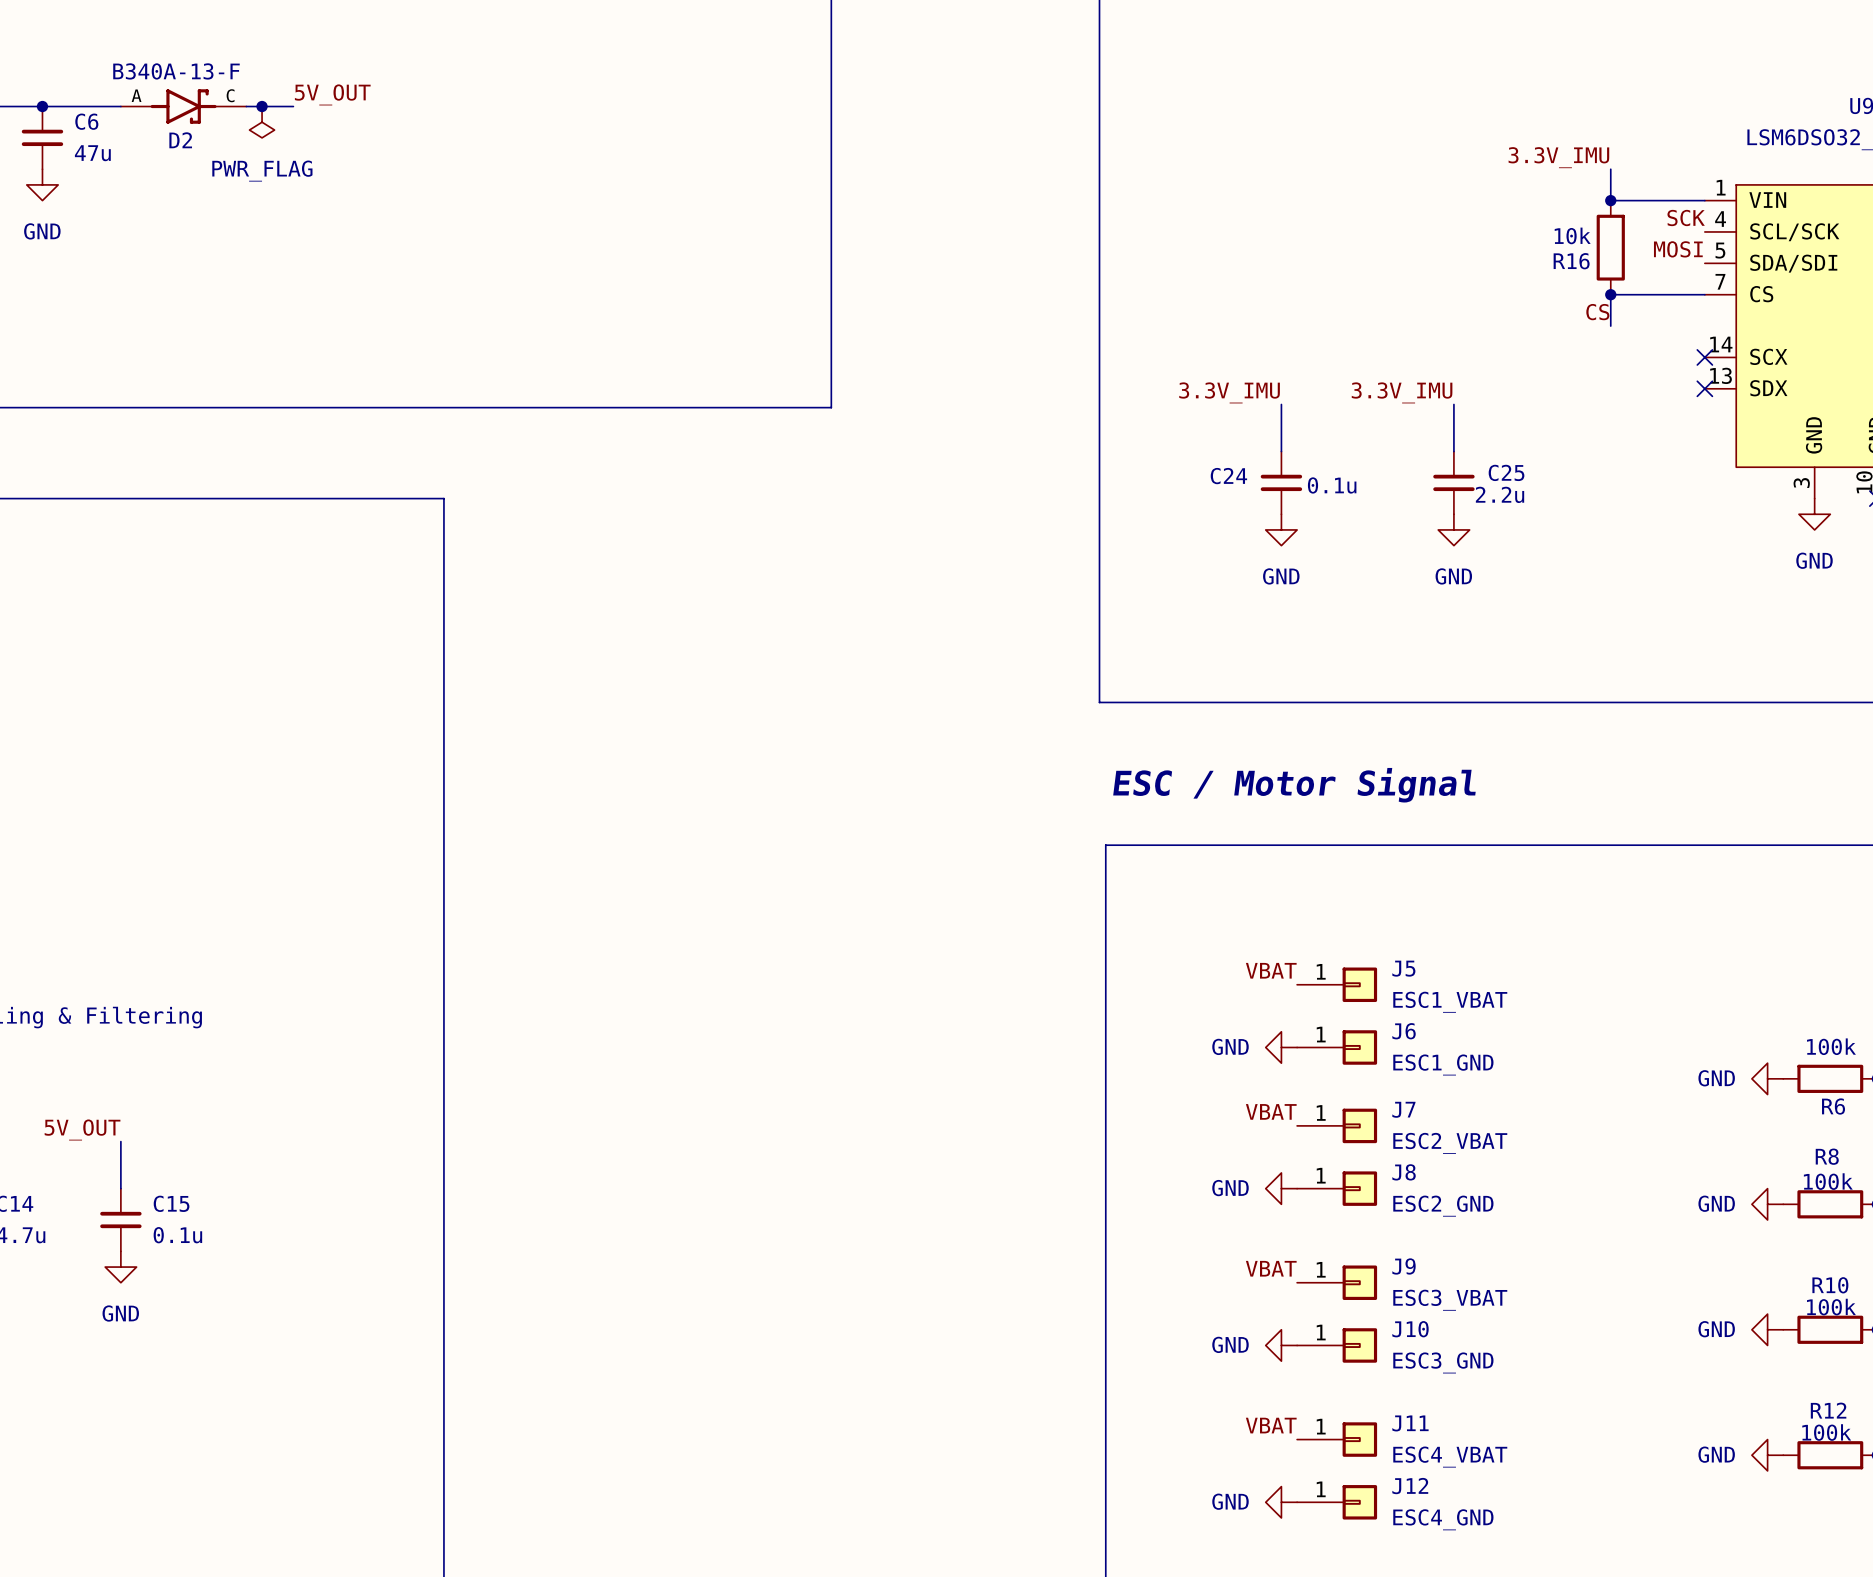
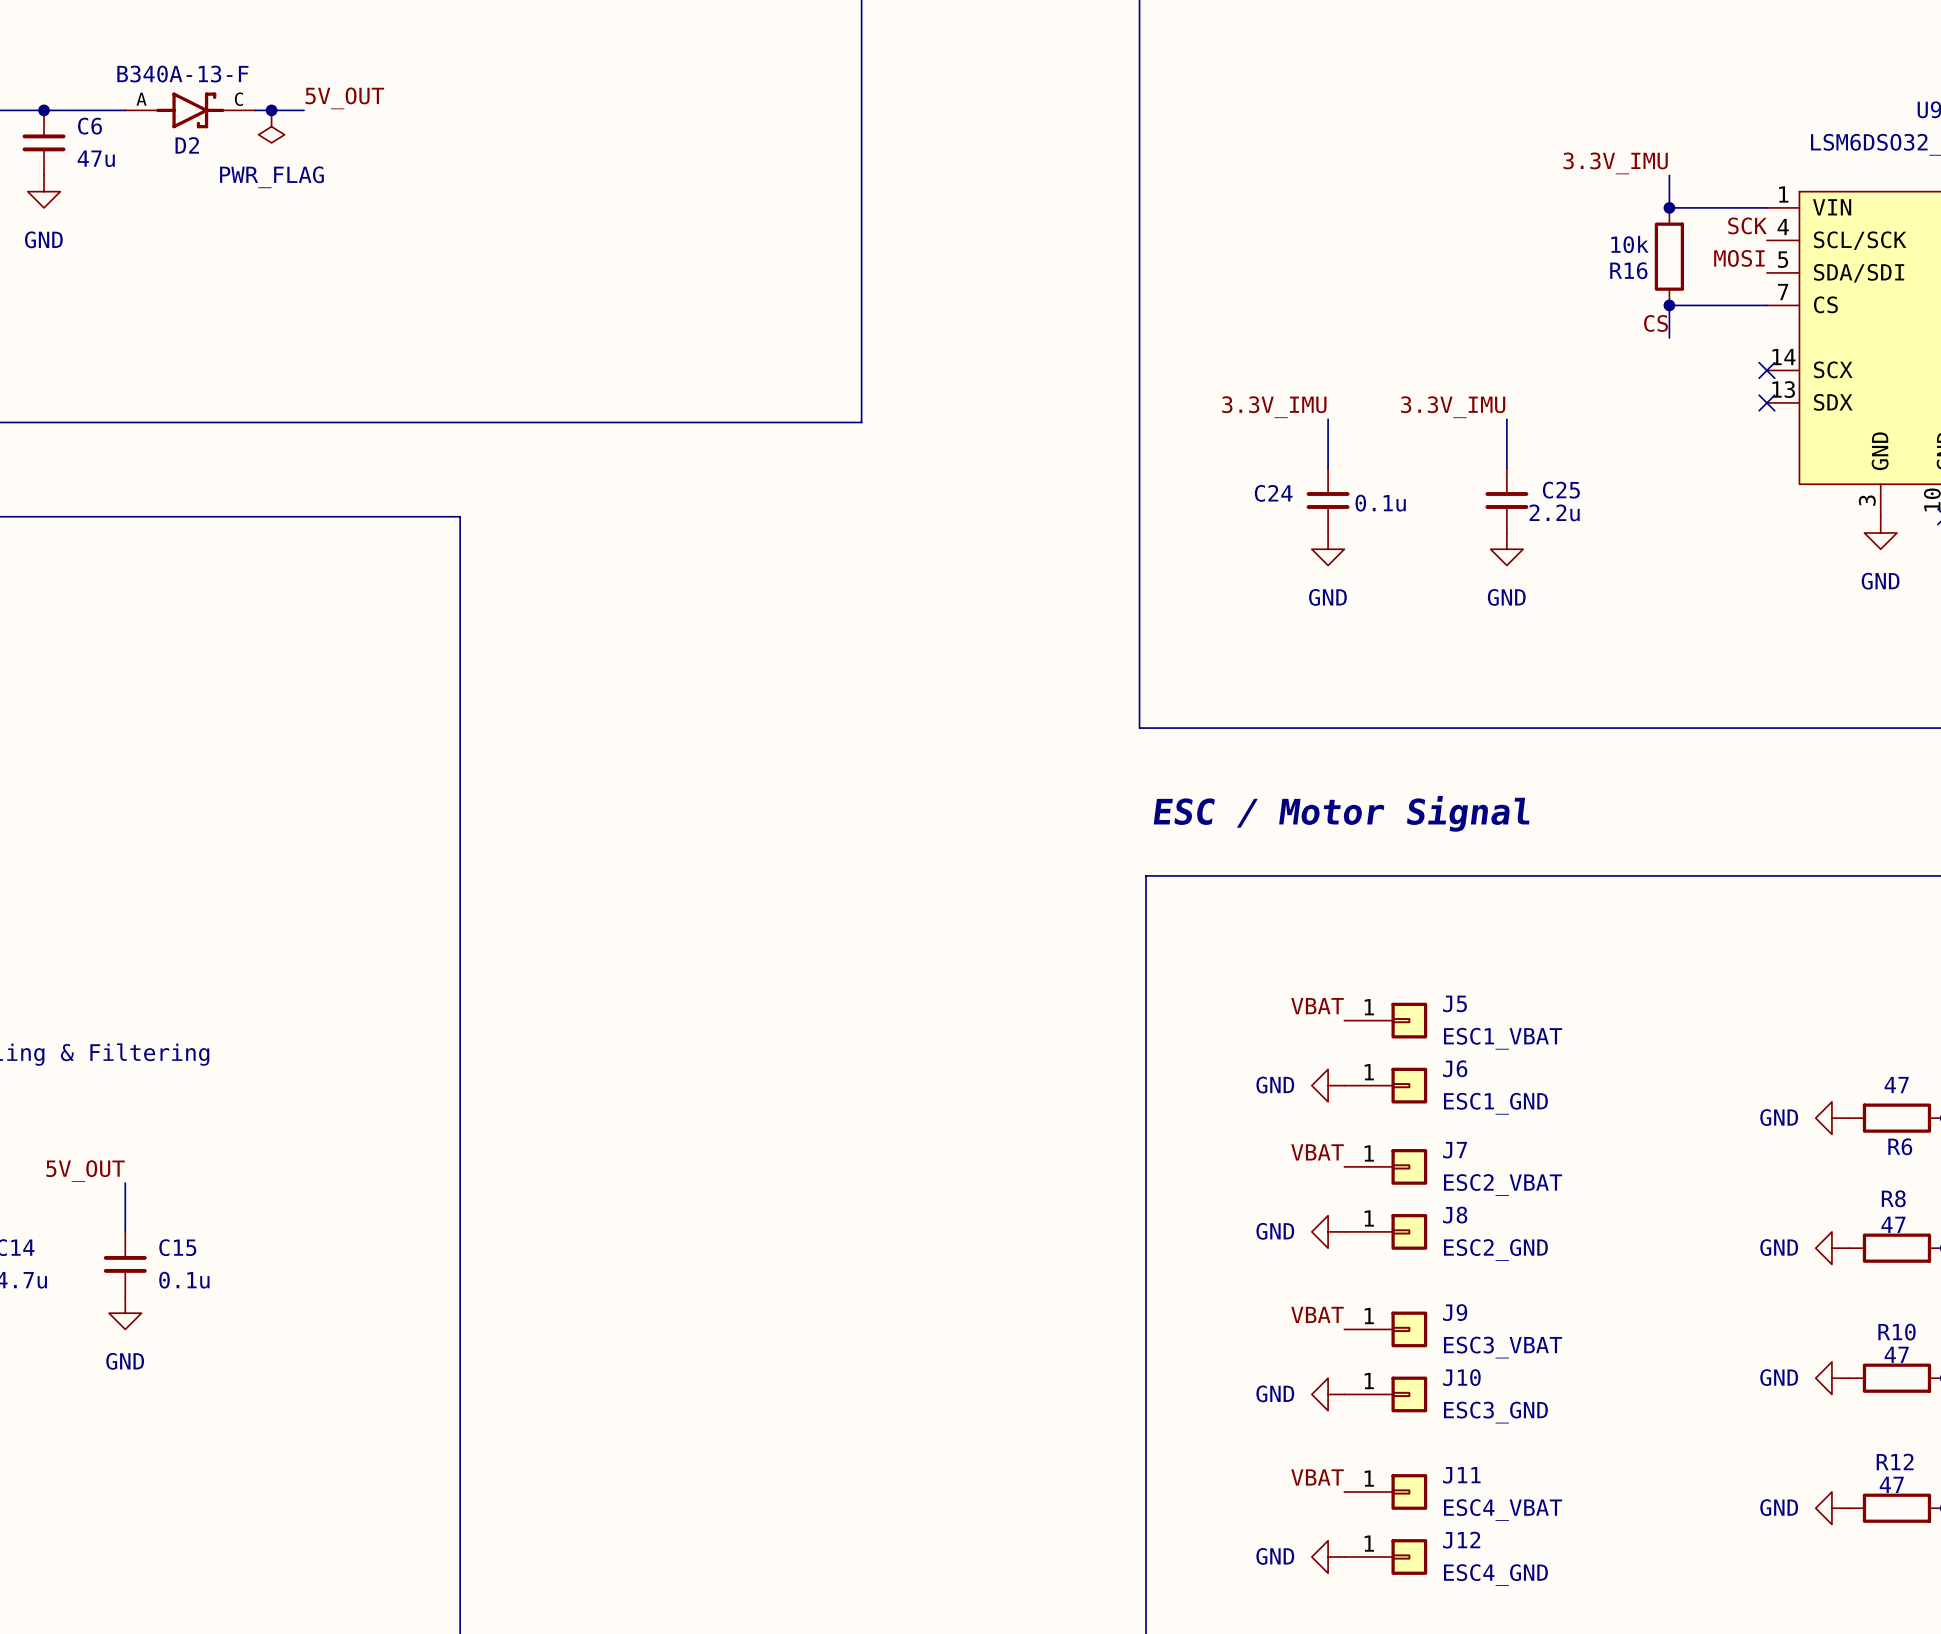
R6 value: 100k (1831, 1046) -> 47 (1896, 1085)
R8 value: 100k (1828, 1181) -> 47 (1893, 1224)
R10 value: 100k (1831, 1307) -> 47 (1896, 1354)
R12 value: 100k (1826, 1432) -> 47 (1891, 1484)

